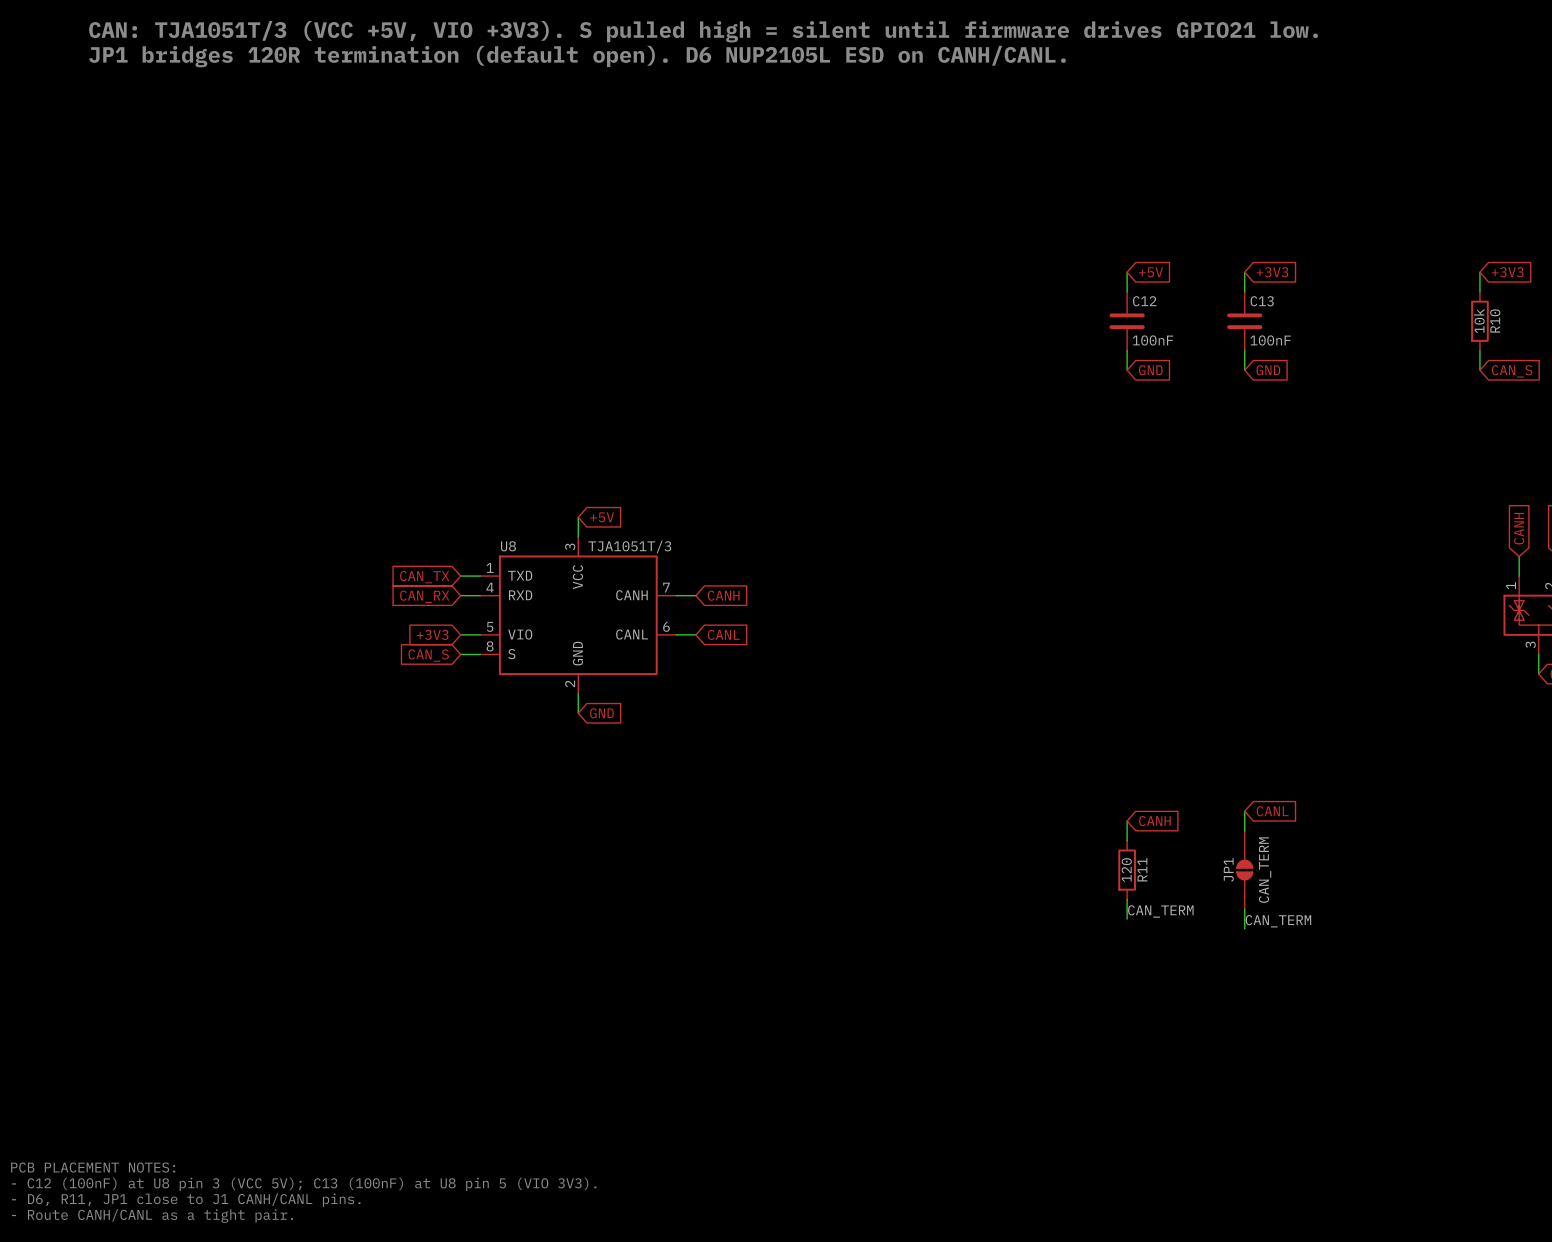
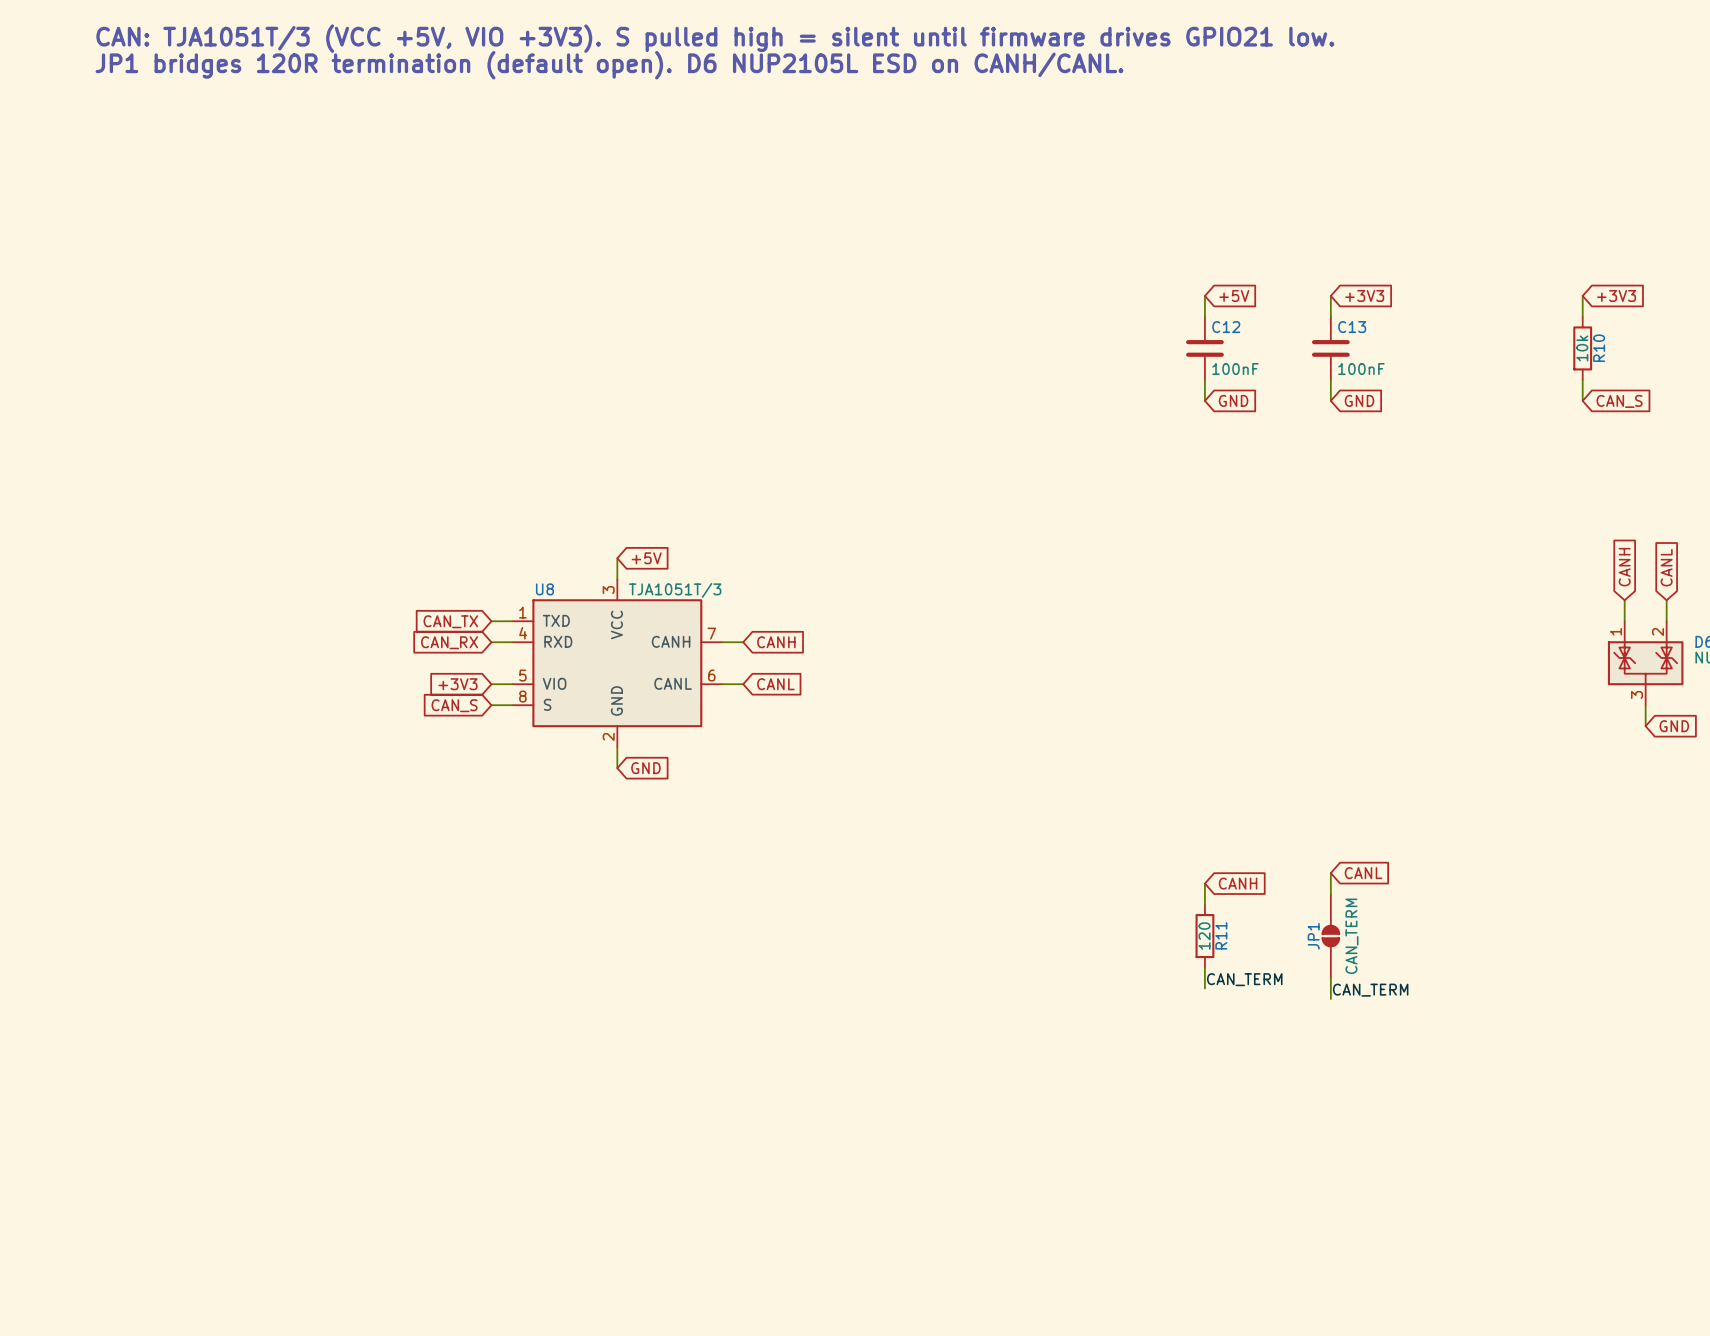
text: PCB PLACEMENT NOTES: (93, 1167) -> none
text: - C12 (100nF) at U8 pin 3 (VCC 5V); C13 (100nF) at U8 pin 5 (VIO 3V3). (304, 1184) -> none
text: - D6, R11, JP1 close to J1 CANH/CANL pins. (186, 1200) -> none
text: - Route CANH/CANL as a tight pair. (152, 1215) -> none

